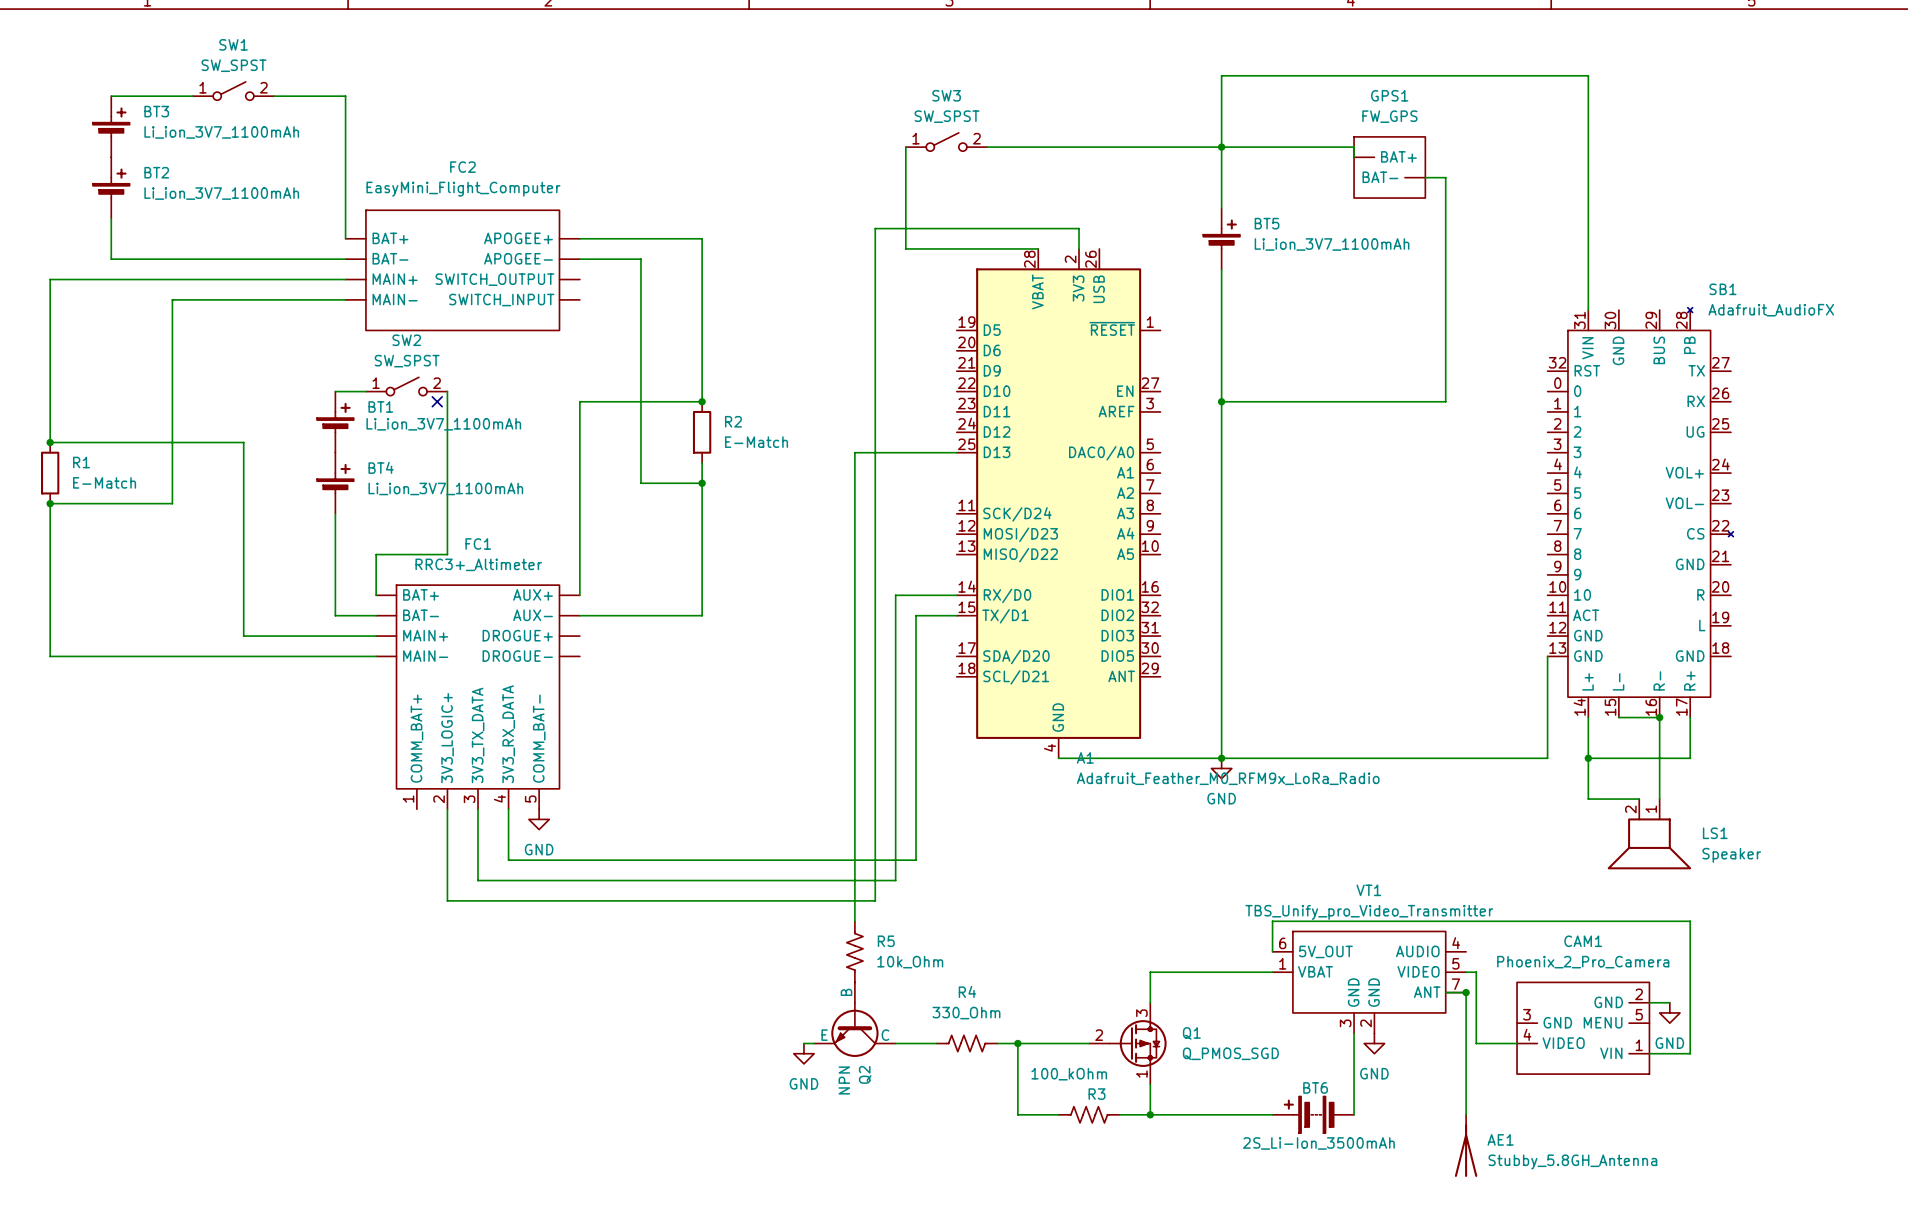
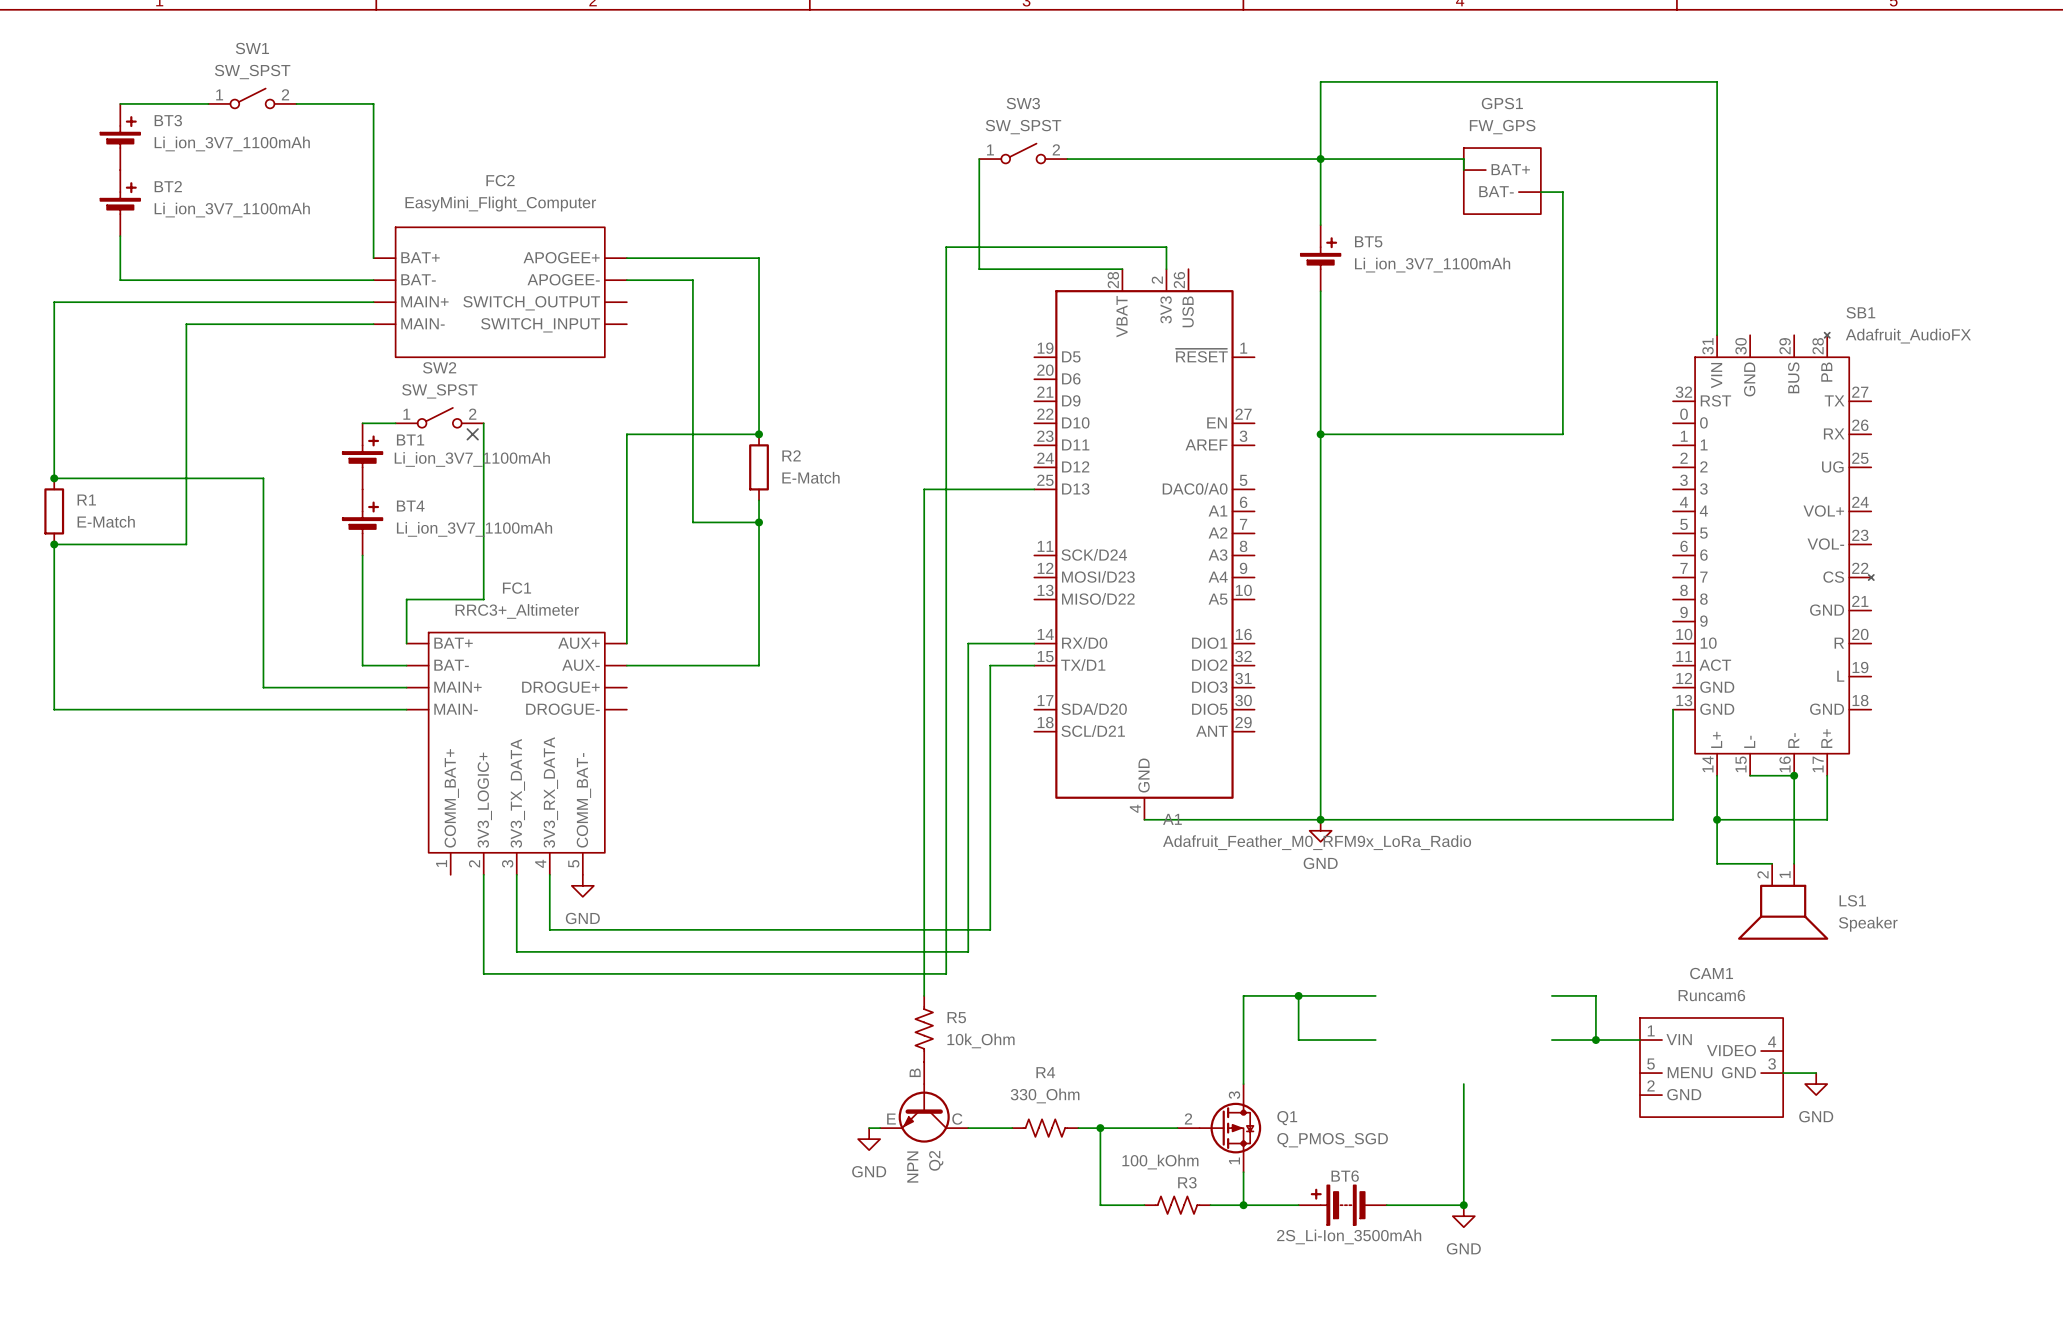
wire: none -> (1298, 995) (1298, 1040) (1375, 1040)
junction: none -> (1298, 995)
wire: (1435, 921) (1272, 921) (1272, 951) -> none
wire: (1476, 921) (1690, 921) (1690, 1053) (1649, 1053) -> (1595, 995) (1595, 1040)
wire: none -> (1551, 1040) (1639, 1040)
CAM1 value: Phoenix_2_Pro_Camera (1583, 962) -> Runcam6 (1711, 995)
wire: (1150, 972) (1272, 972) -> (1243, 1051) (1243, 995) (1375, 995)
wire: (1466, 972) (1476, 972) (1476, 1043) (1517, 1043) -> none
VT1: TBS_Unify_pro_Video_Transmitter (1369, 982) -> none
wire: (1445, 992) (1466, 992) (1466, 1114) -> none
junction position: (1466, 992) -> (1595, 1040)
wire: none -> (1783, 1073) (1816, 1073)
wire: (1649, 1002) (1669, 1002) -> none
power symbol position: GND (1669, 1012) -> GND (1816, 1084)
CAM1 rotation: 0° (1583, 1028) -> 180° (1711, 1067)
power symbol position: GND (1374, 1043) -> GND (1463, 1216)
BT6 position: (1313, 1114) -> (1342, 1205)
junction: none -> (1463, 1205)
AE1: Stubby_5.8GH_Antenna (1466, 1145) -> none

